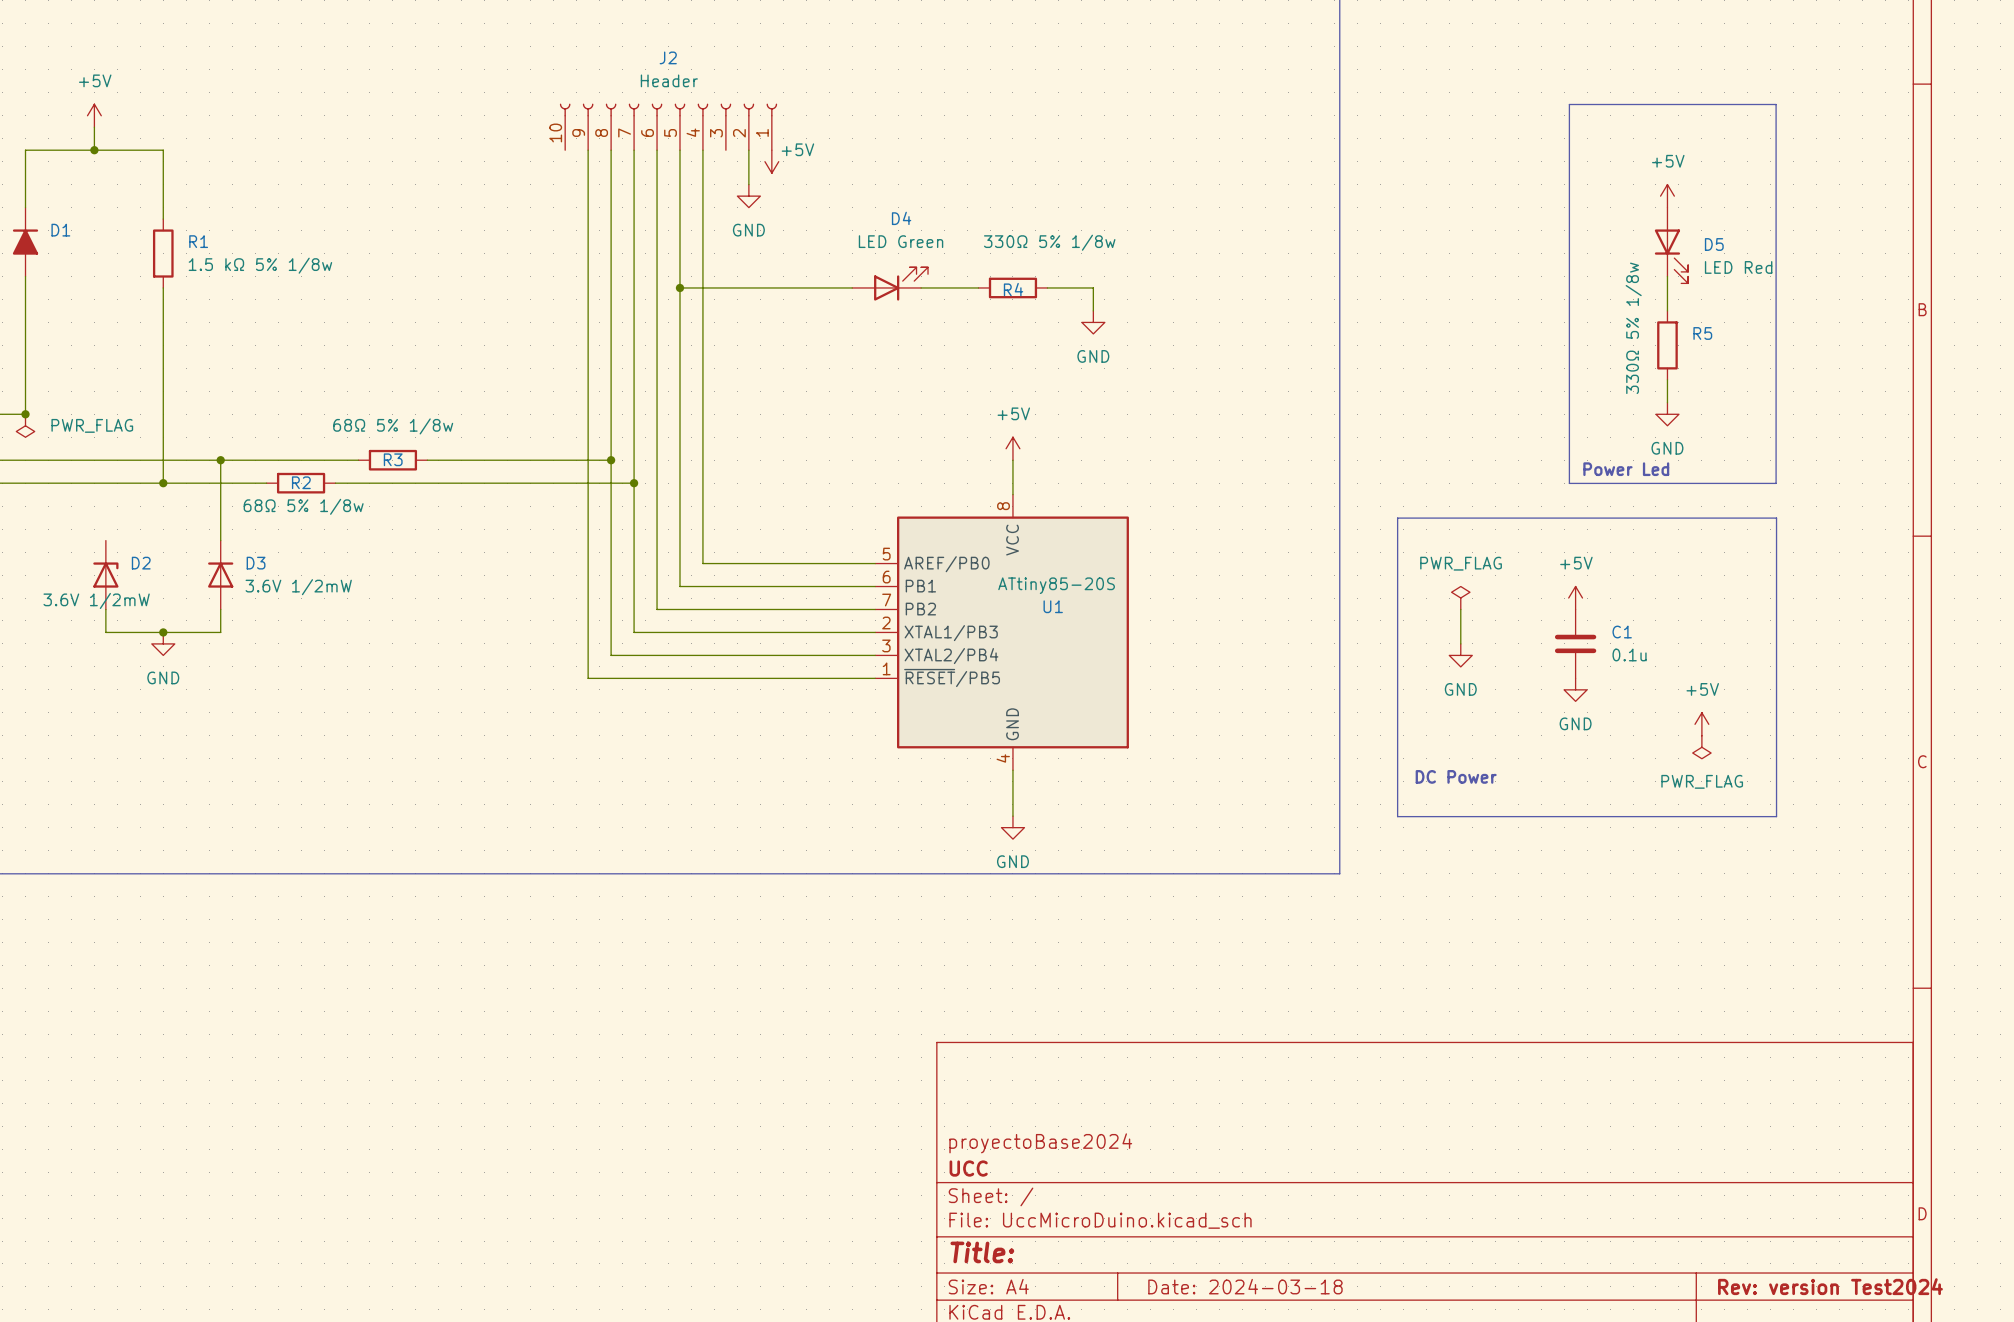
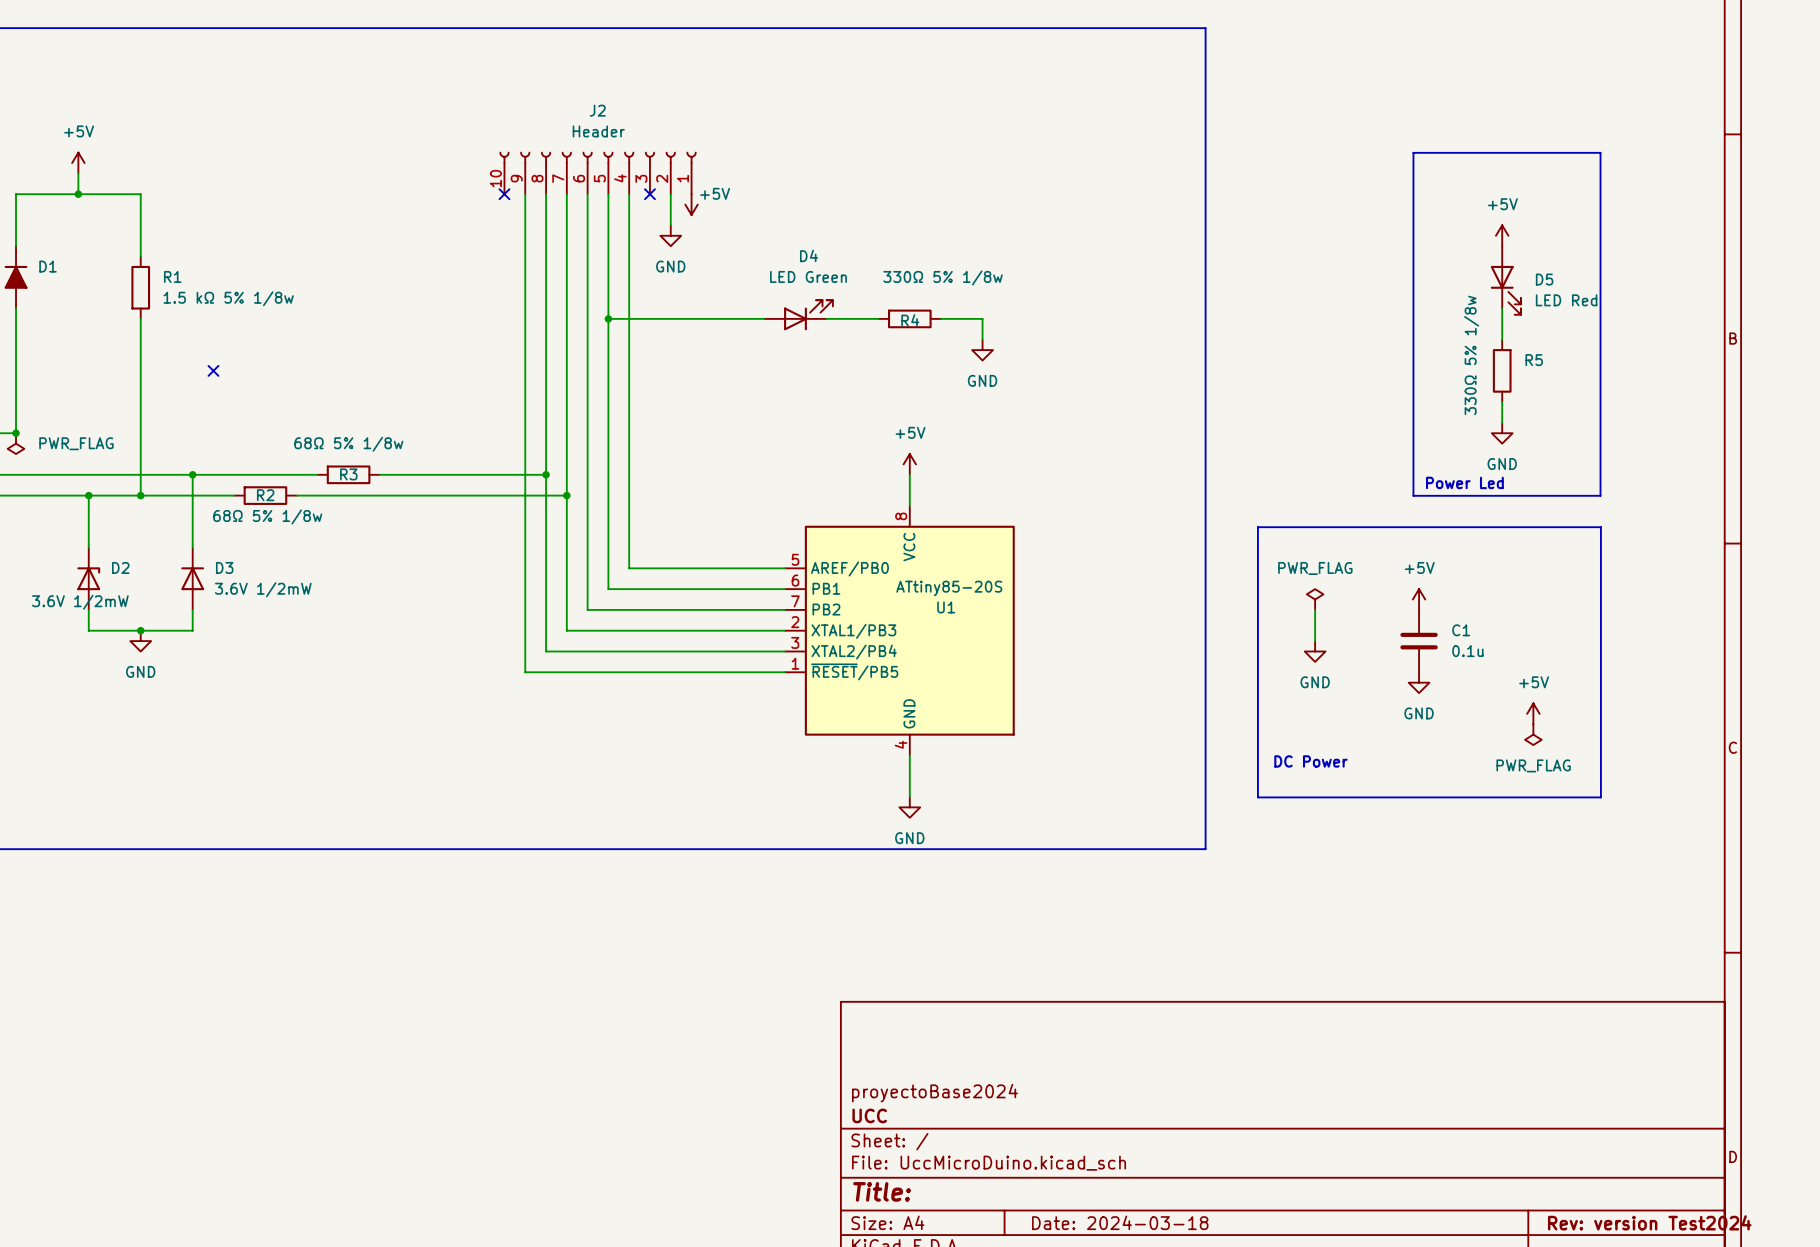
no-connect mark: none -> (504, 194)
no-connect mark: none -> (649, 194)
no-connect mark: none -> (213, 370)
wire: none -> (88, 495) (88, 547)
junction: none -> (88, 495)

